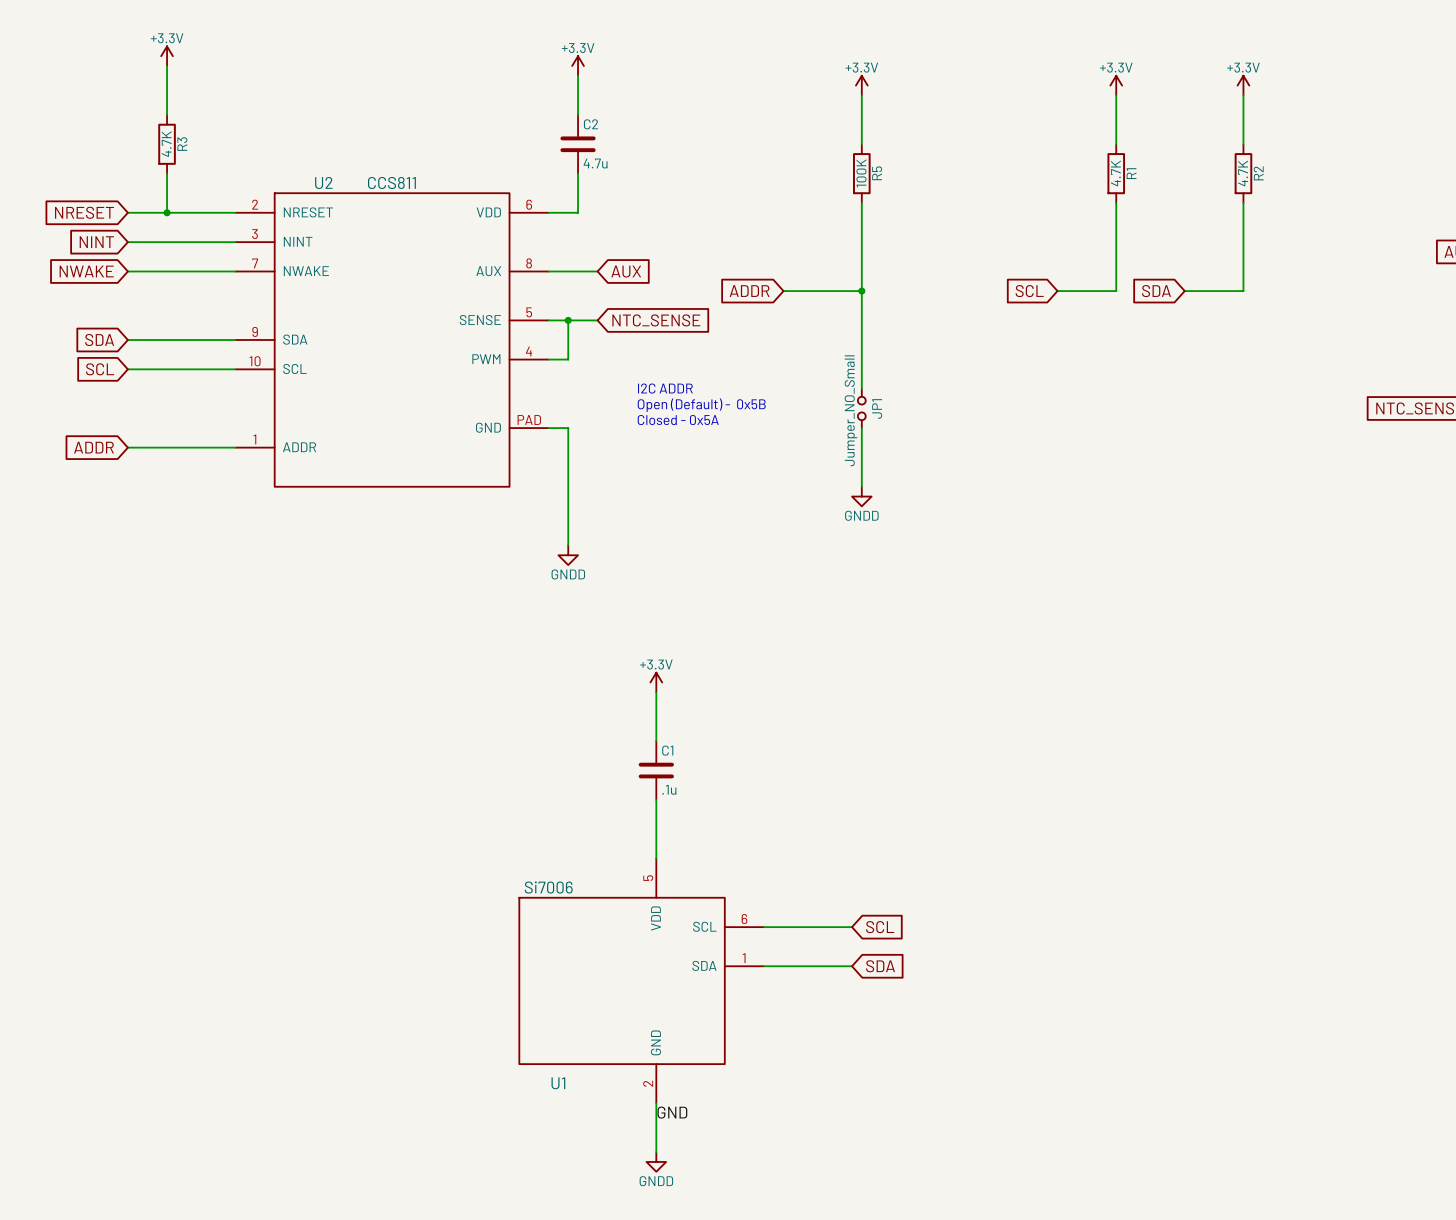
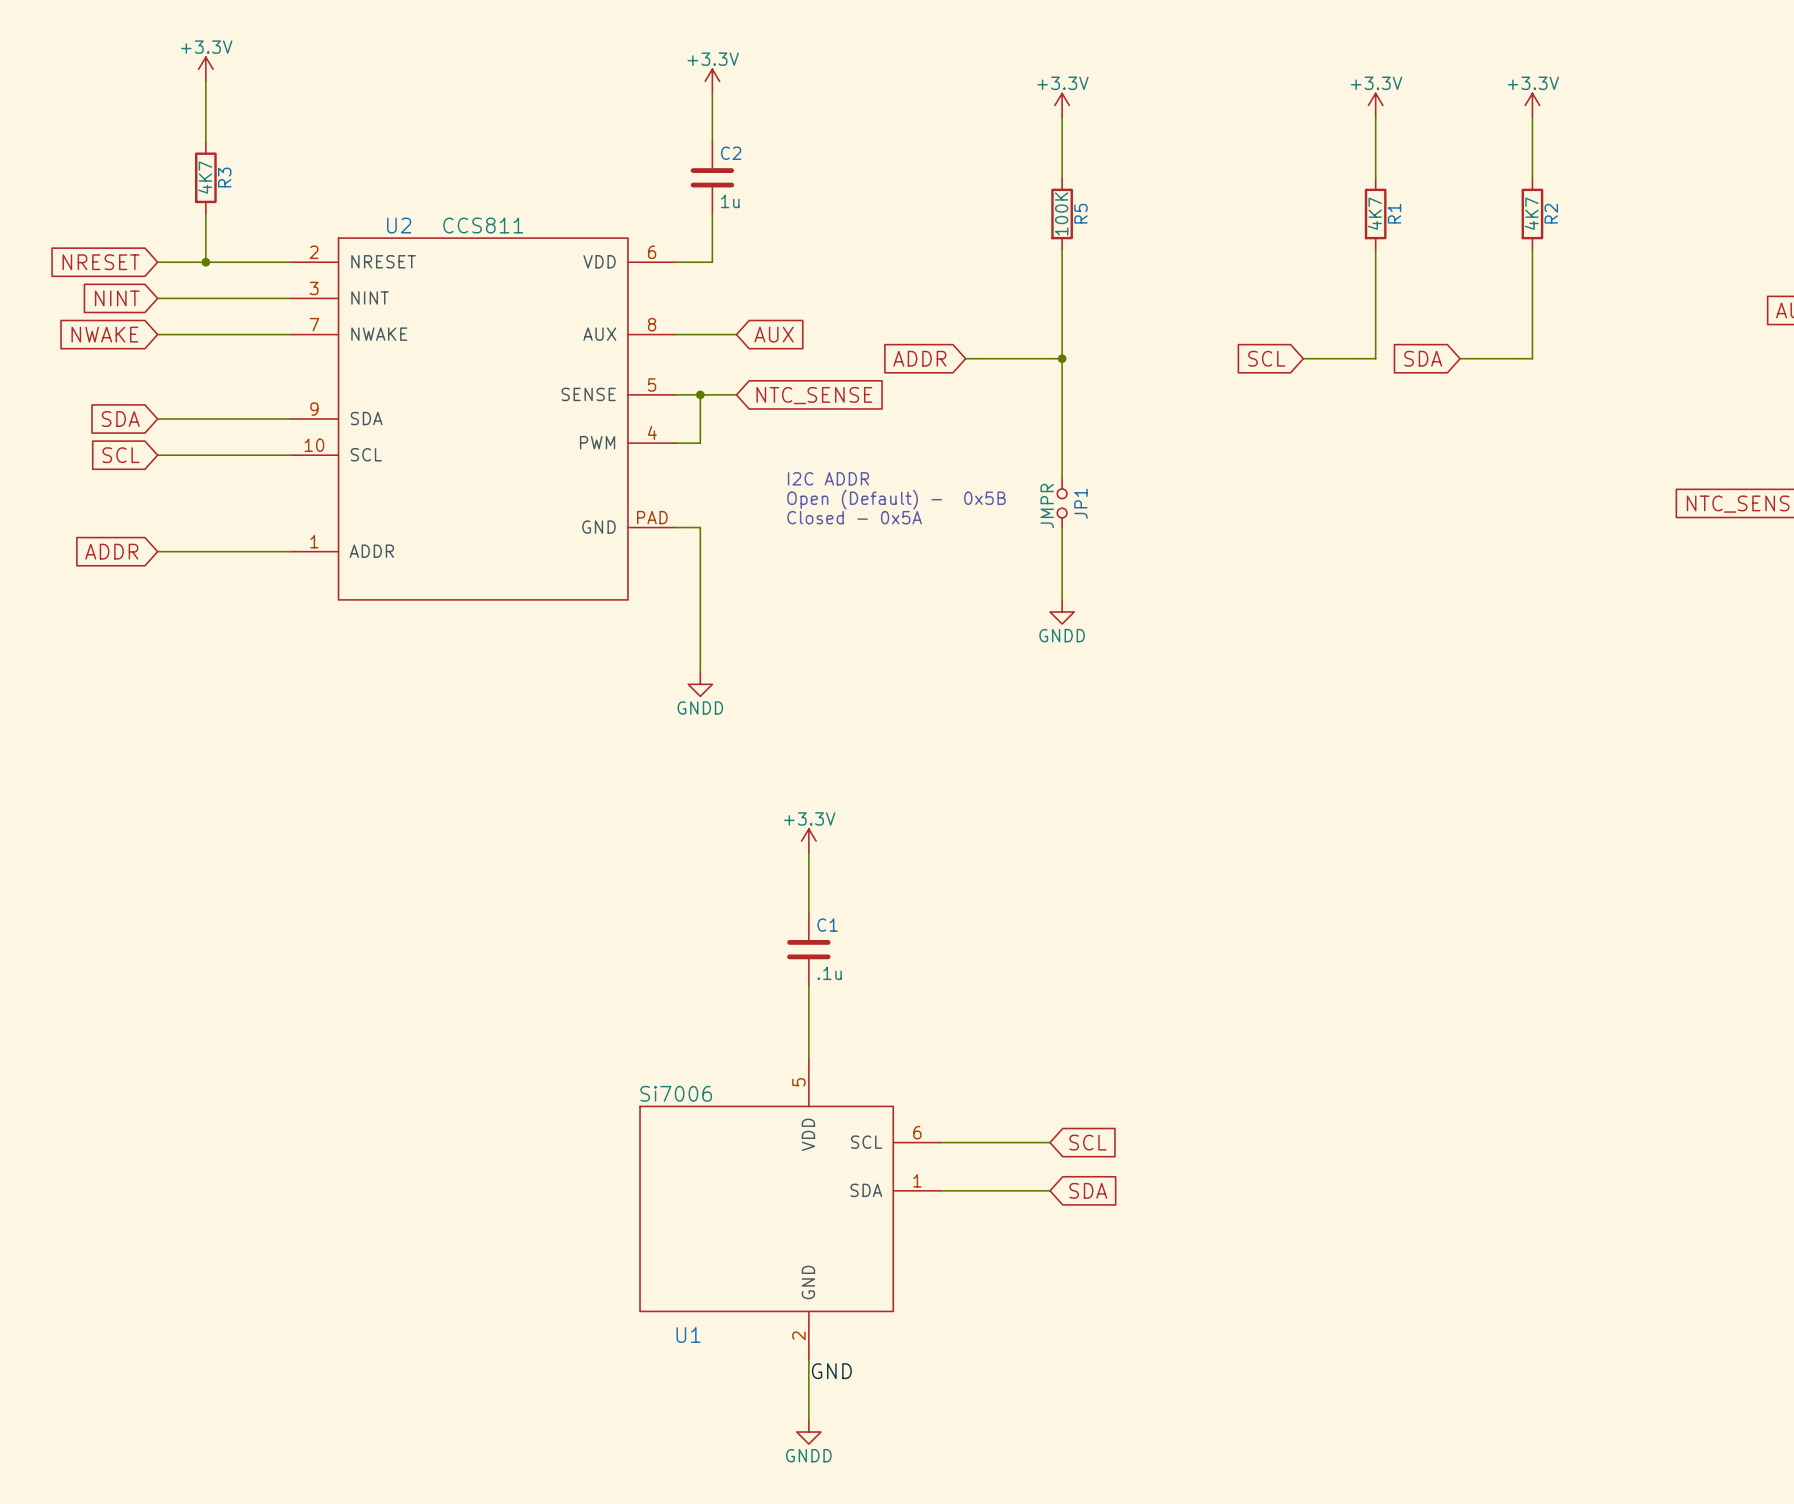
R3 value: 4.7K (166, 144) -> 4K7 (205, 177)
C2 value: 4.7u (595, 163) -> 1u (730, 201)
R1 value: 4.7K (1115, 173) -> 4K7 (1374, 213)
R2 value: 4.7K (1243, 173) -> 4K7 (1531, 213)
JP1 value: Jumper_NO_Small (851, 410) -> JMPR (1047, 506)

